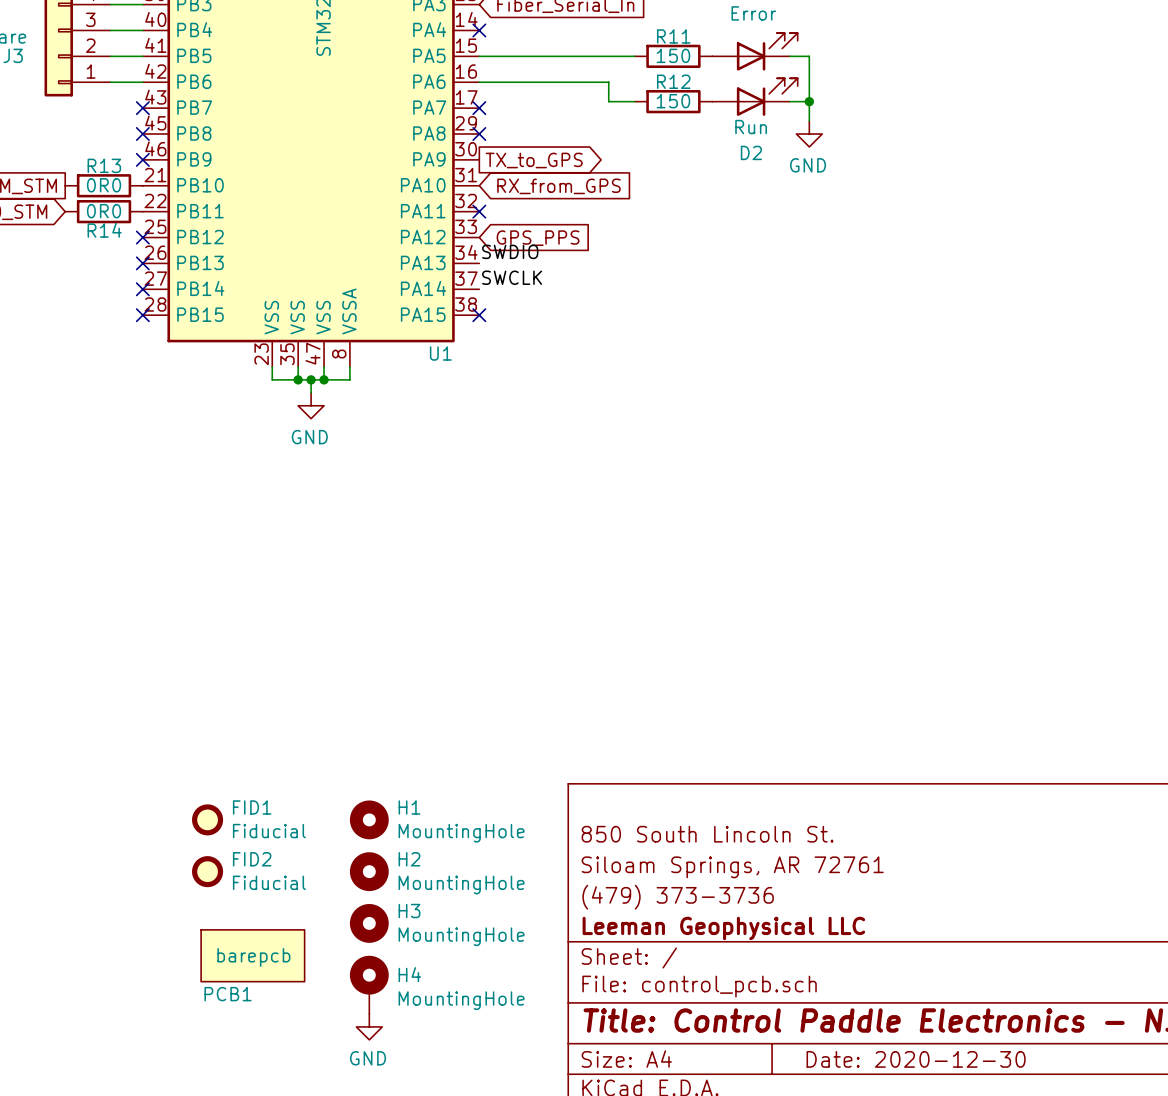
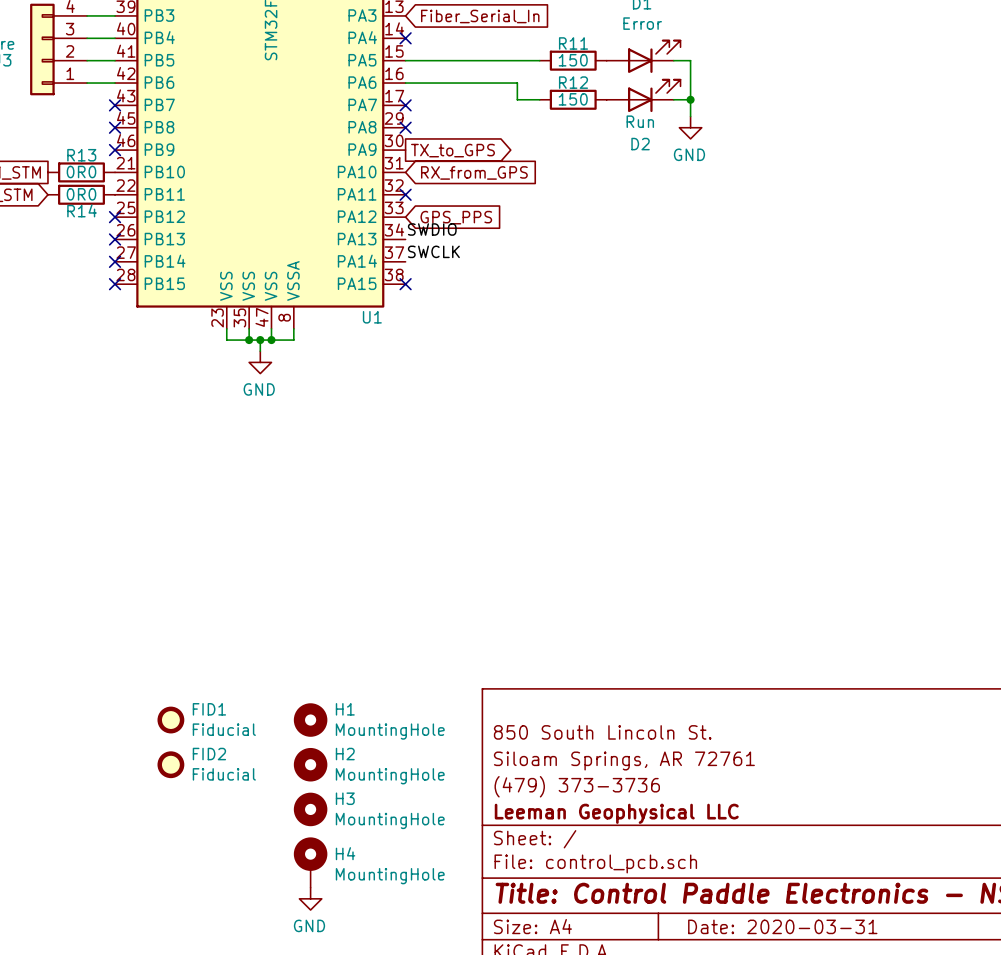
PCB1: barepcb (252, 955) -> none
title block: Date: 2020-12-30 (916, 1059) -> Date: 2020-03-31 (782, 926)

